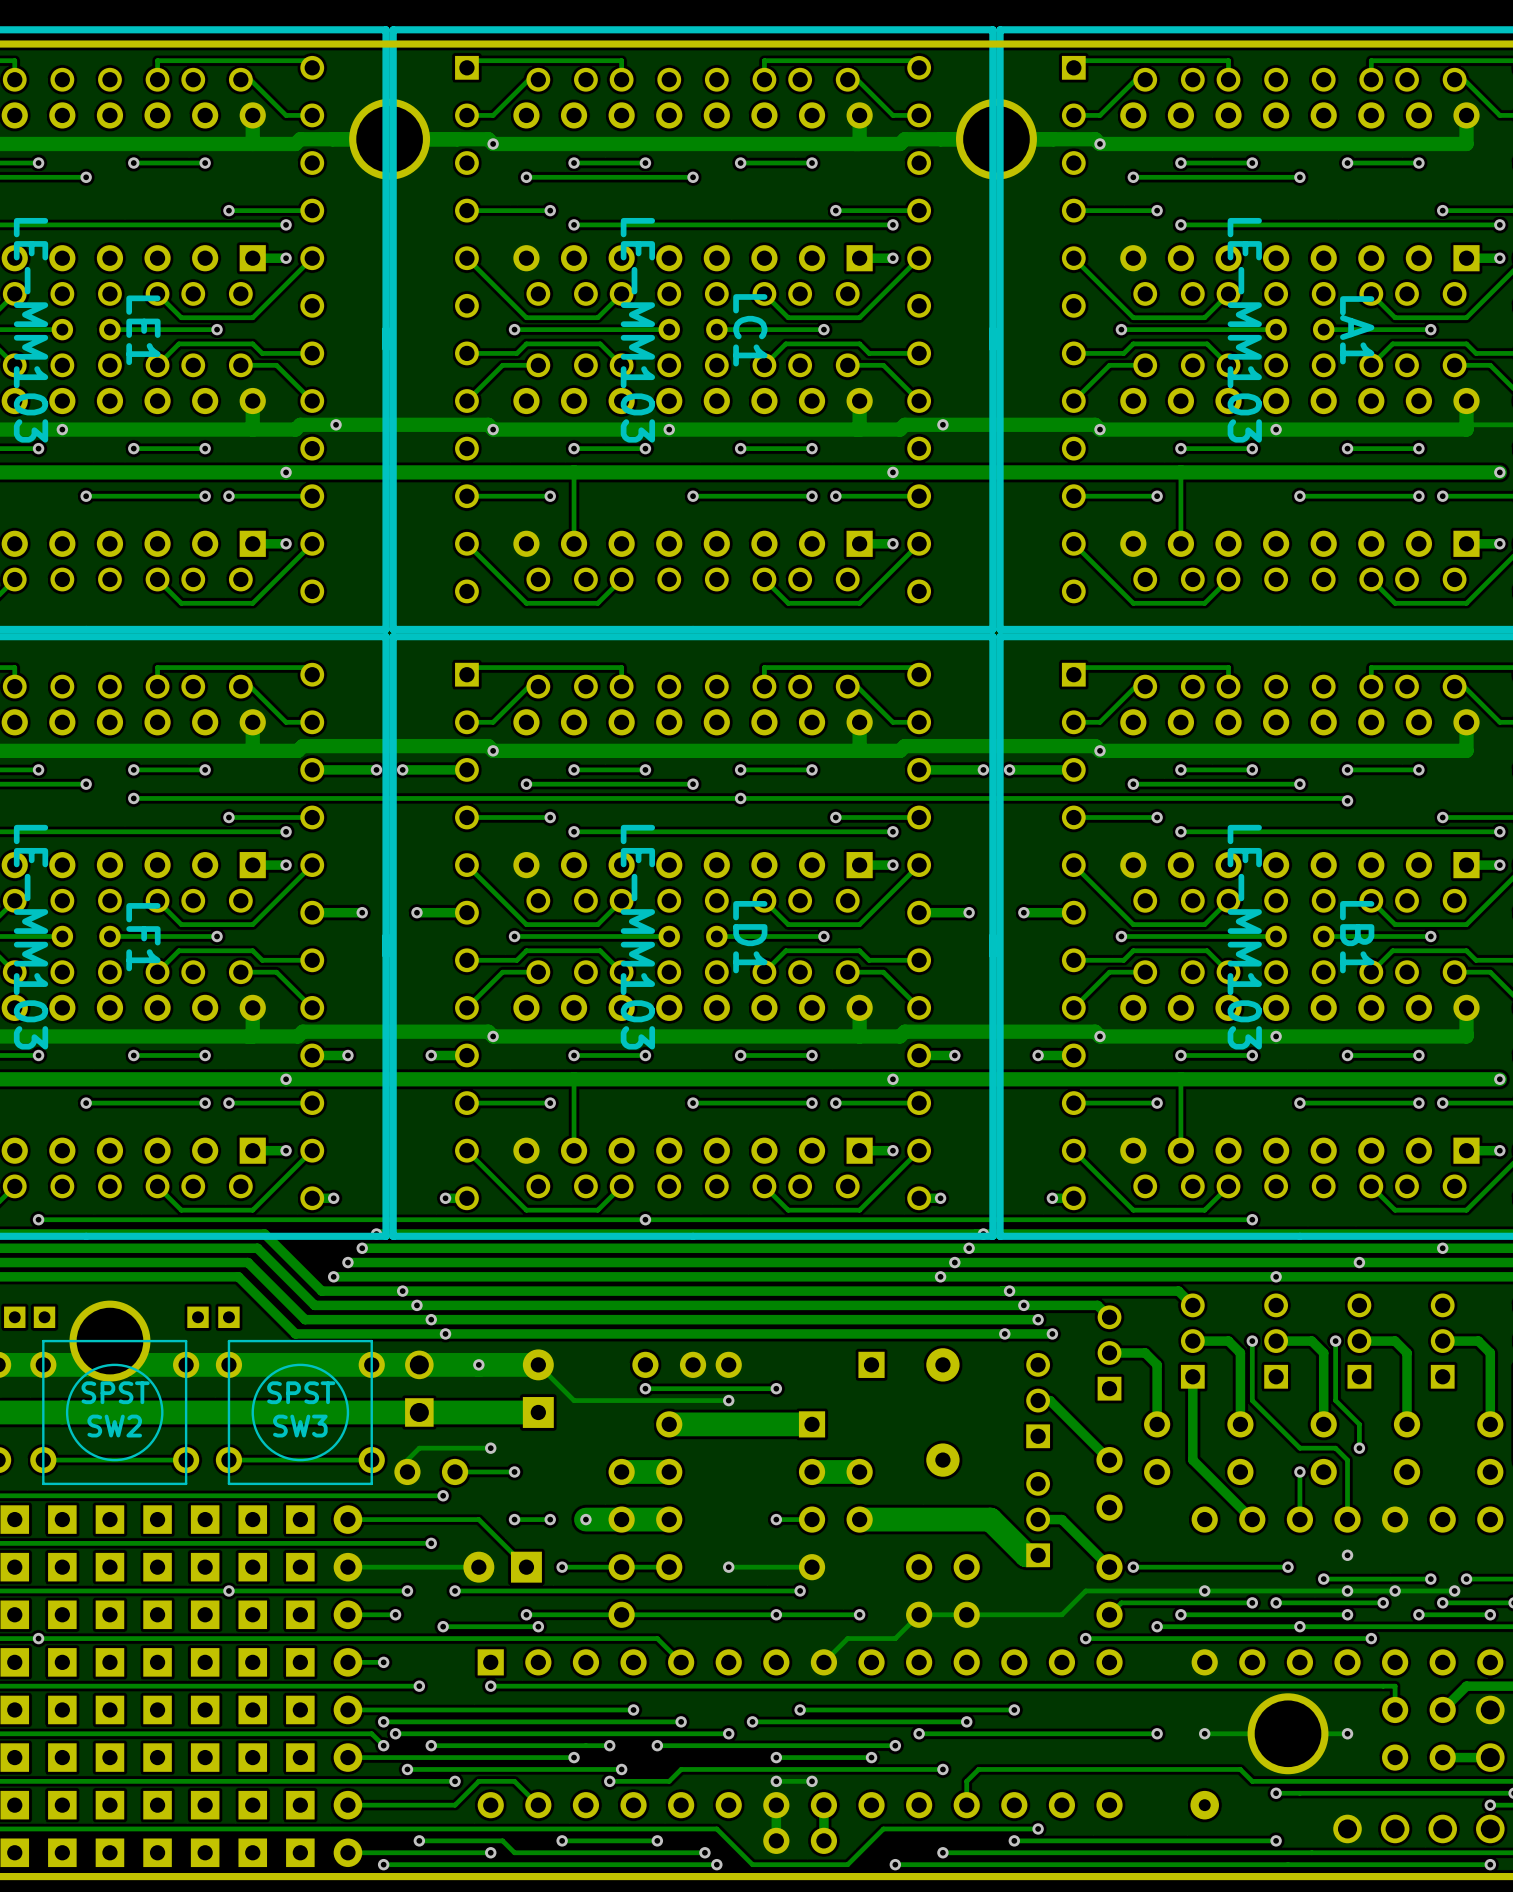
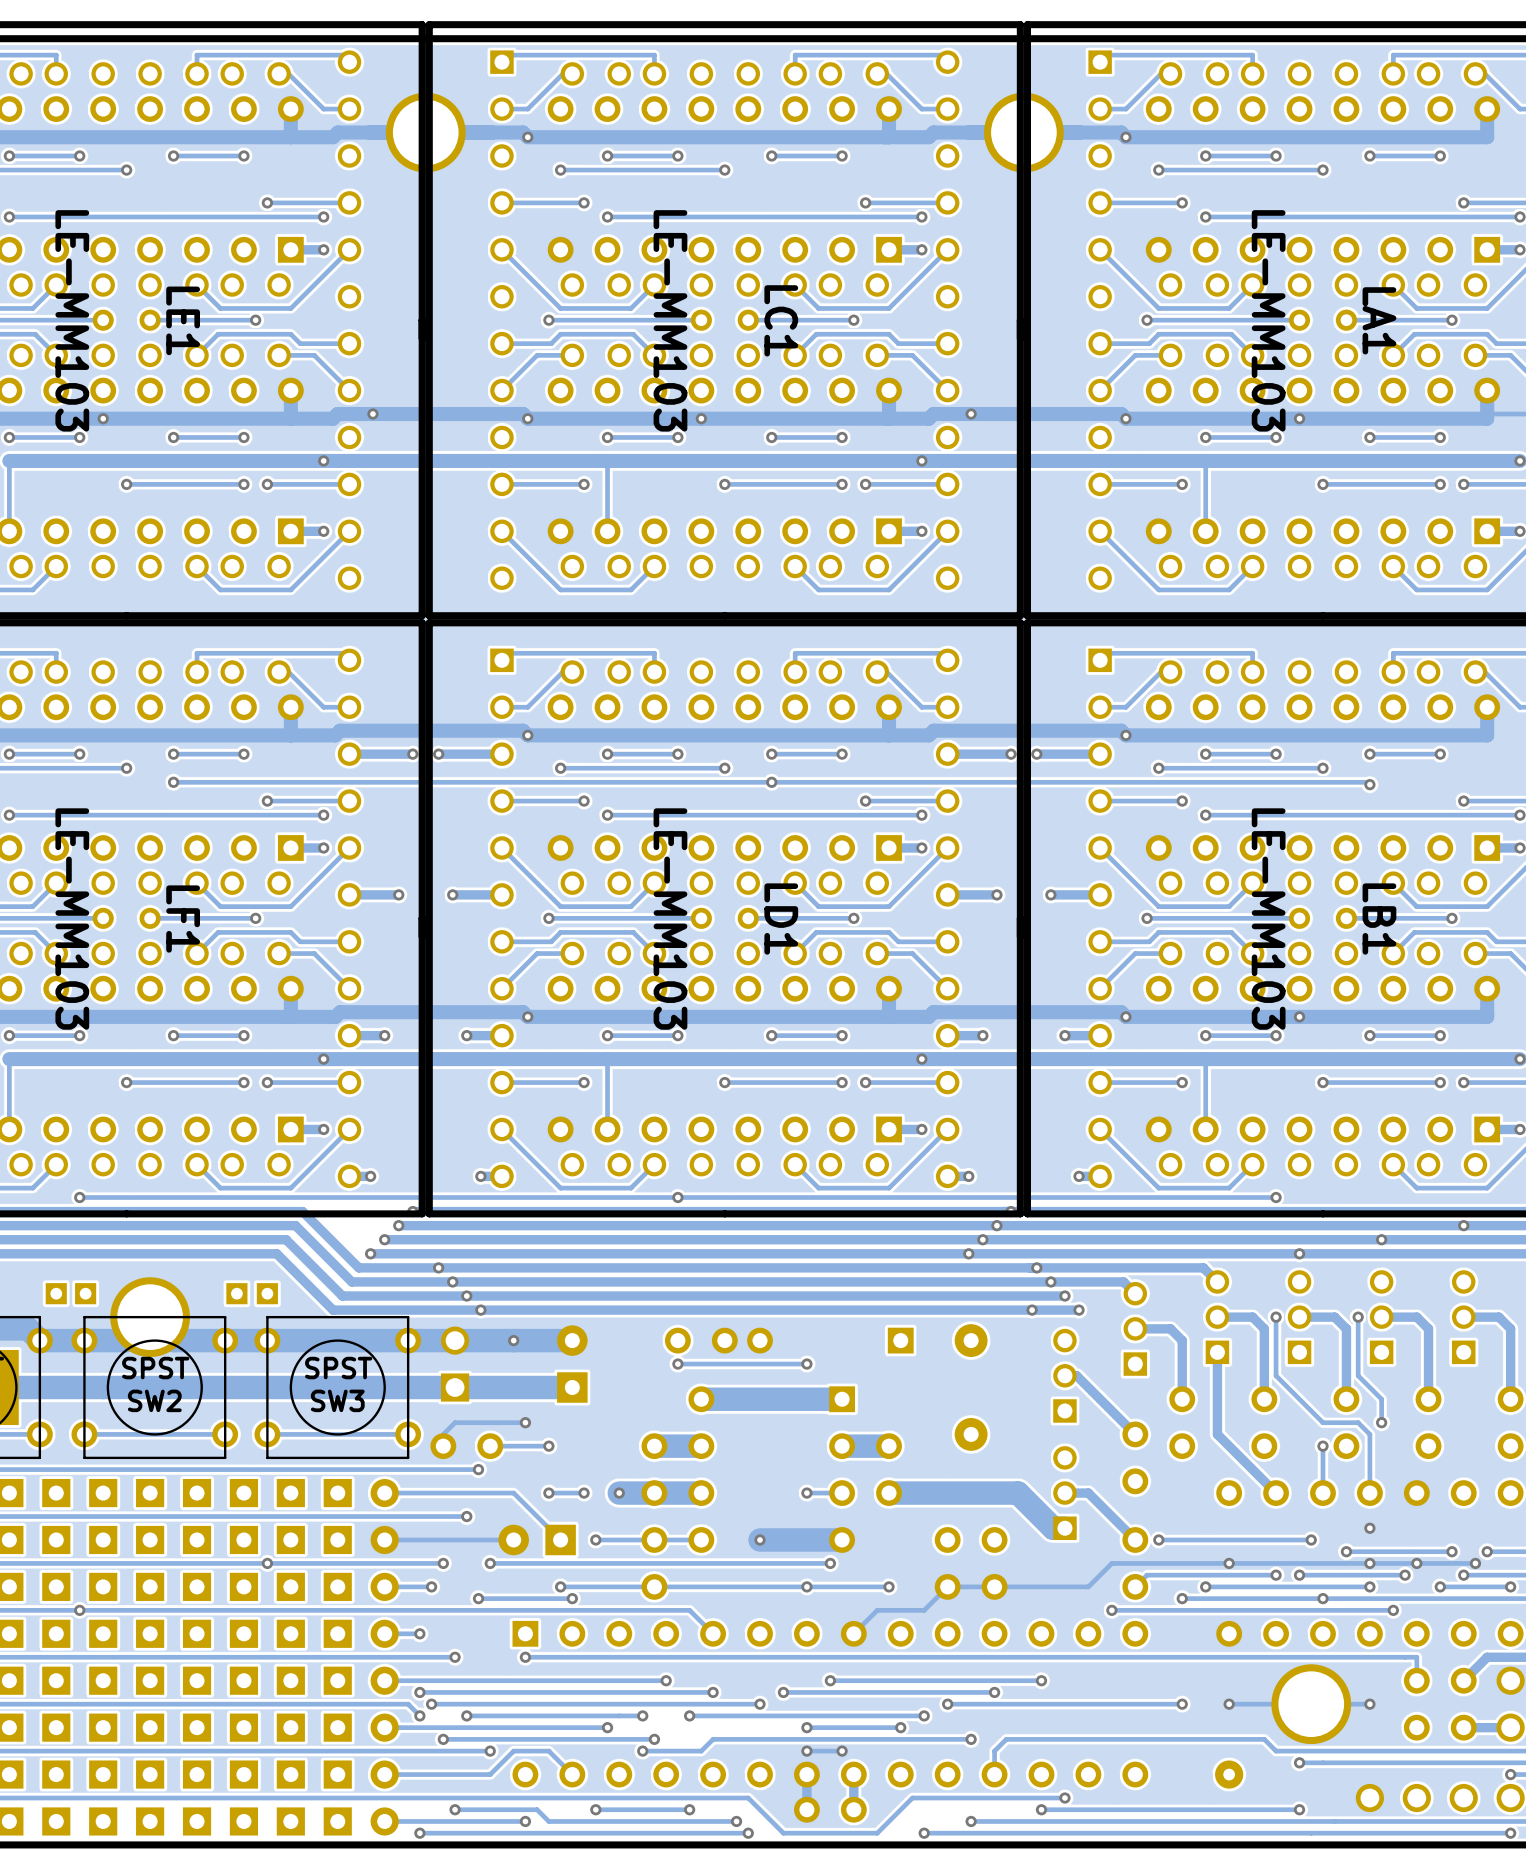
track: (538, 1364) (574, 1400) (728, 1400) -> none
via: (728, 1400) -> none
track width: thin (812, 1567) (728, 1567) -> thick (842, 1539) (760, 1539)

